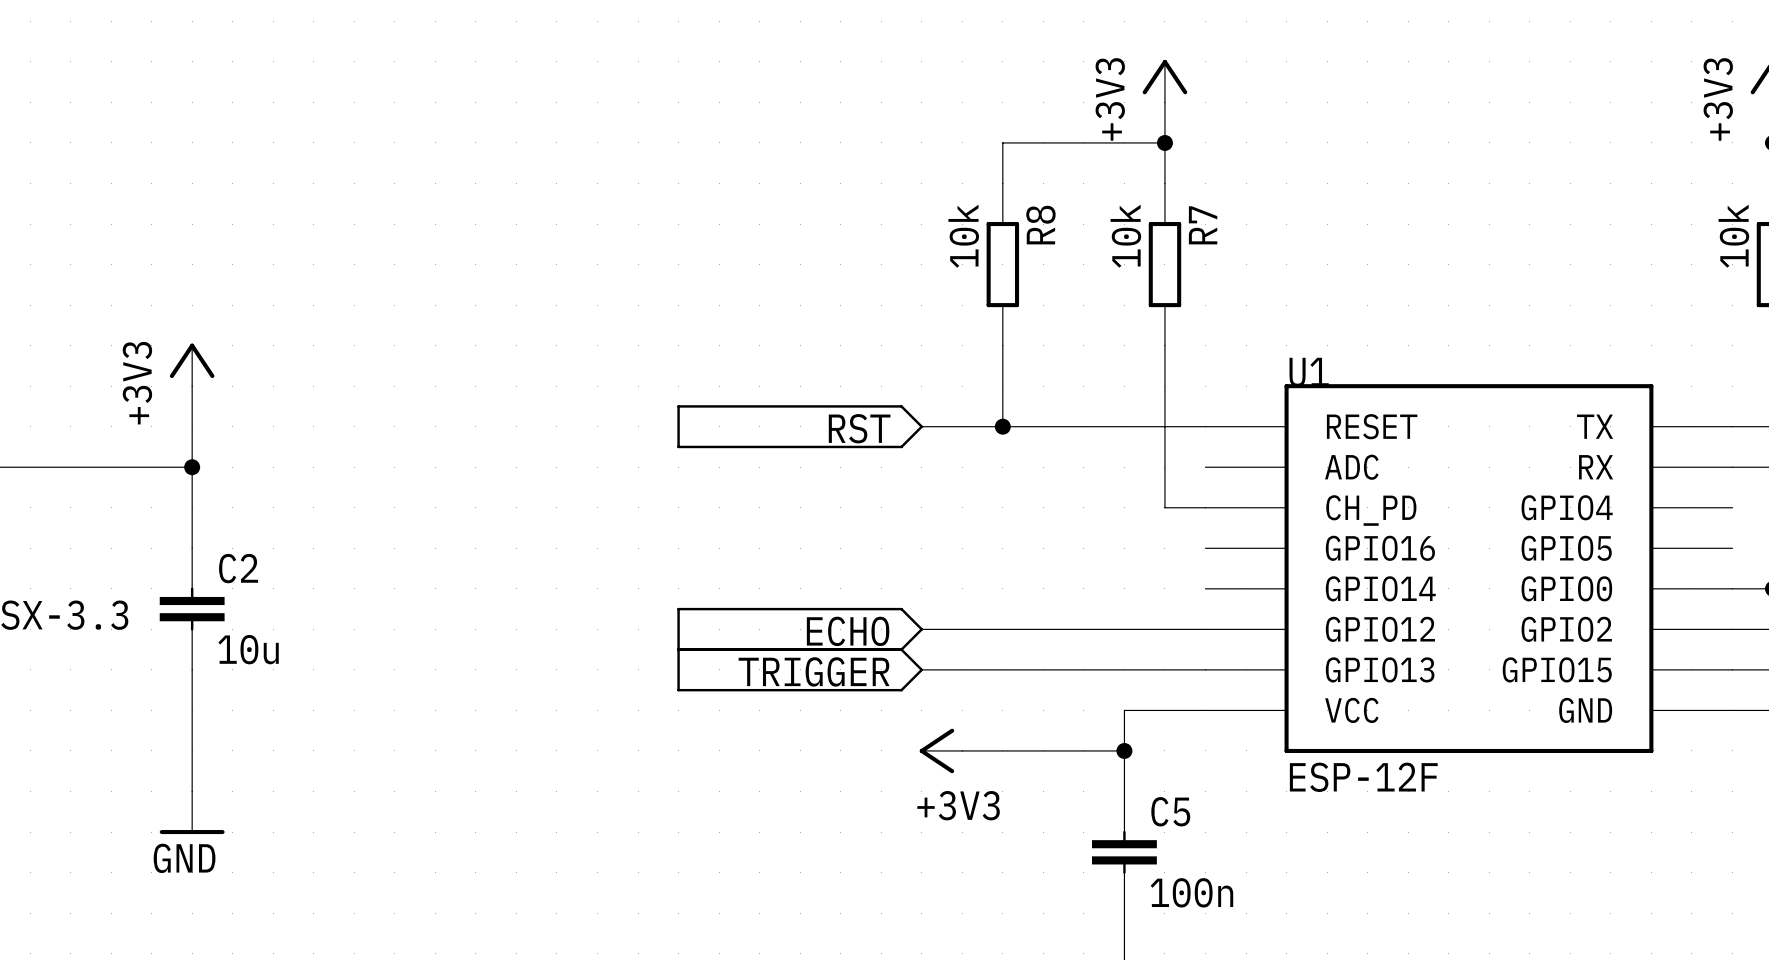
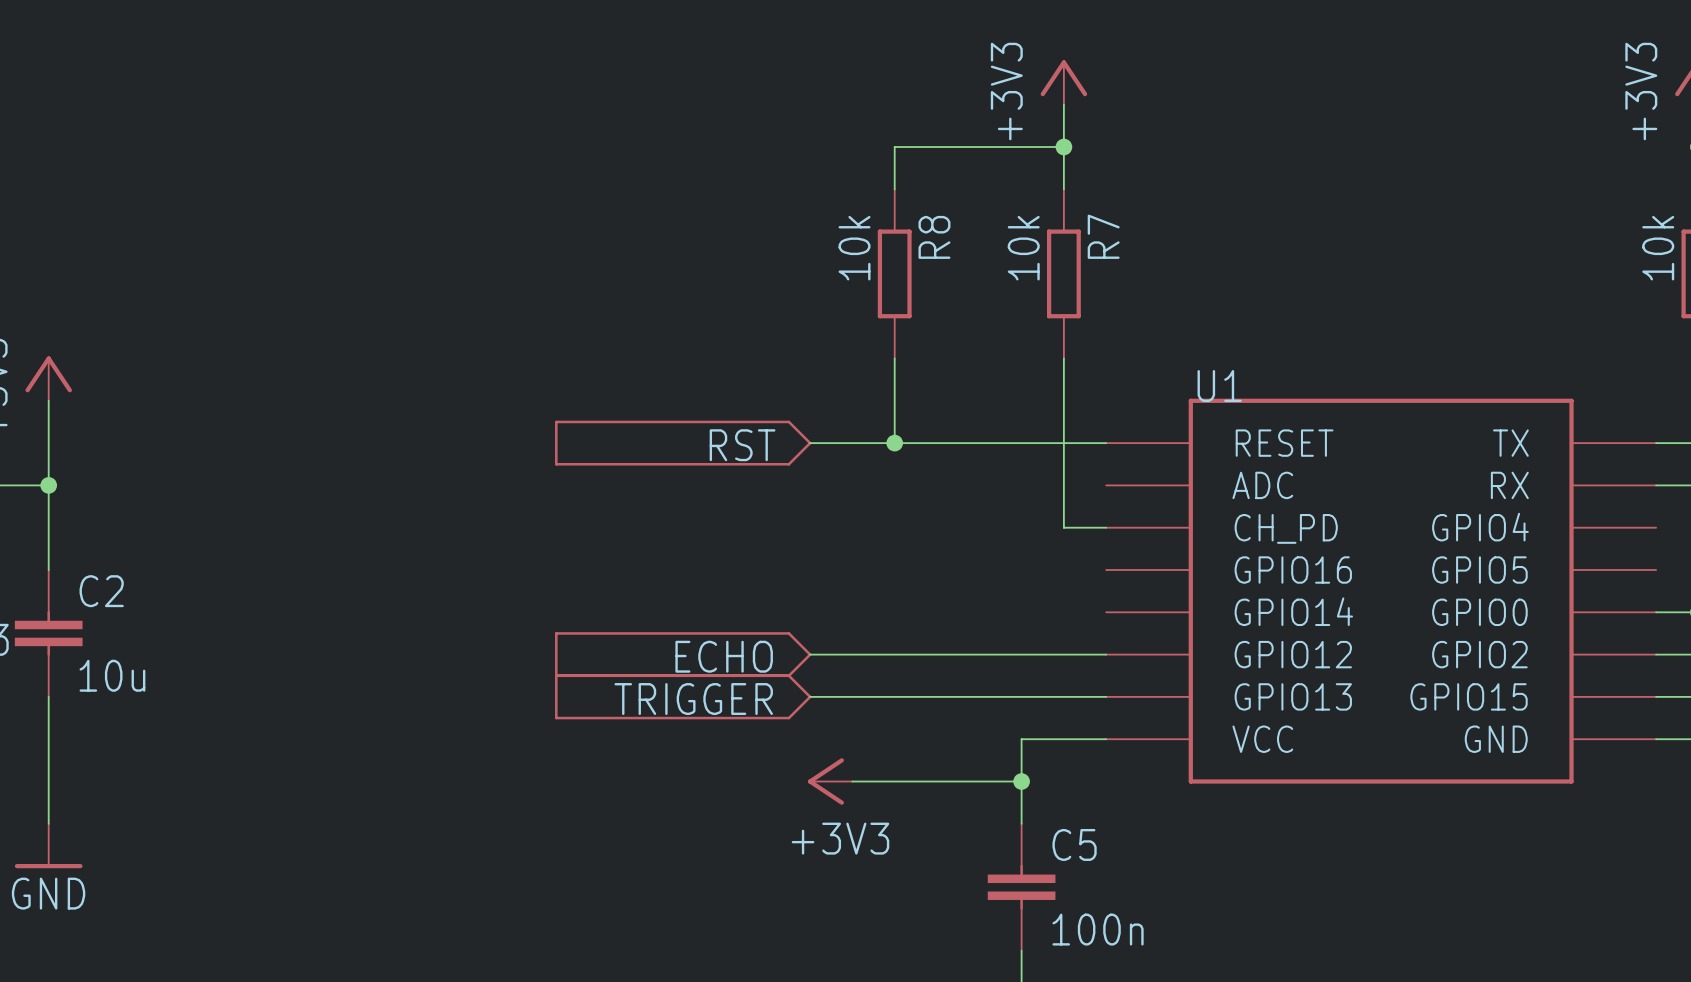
U1 value: ESP-12F (1363, 777) -> none

